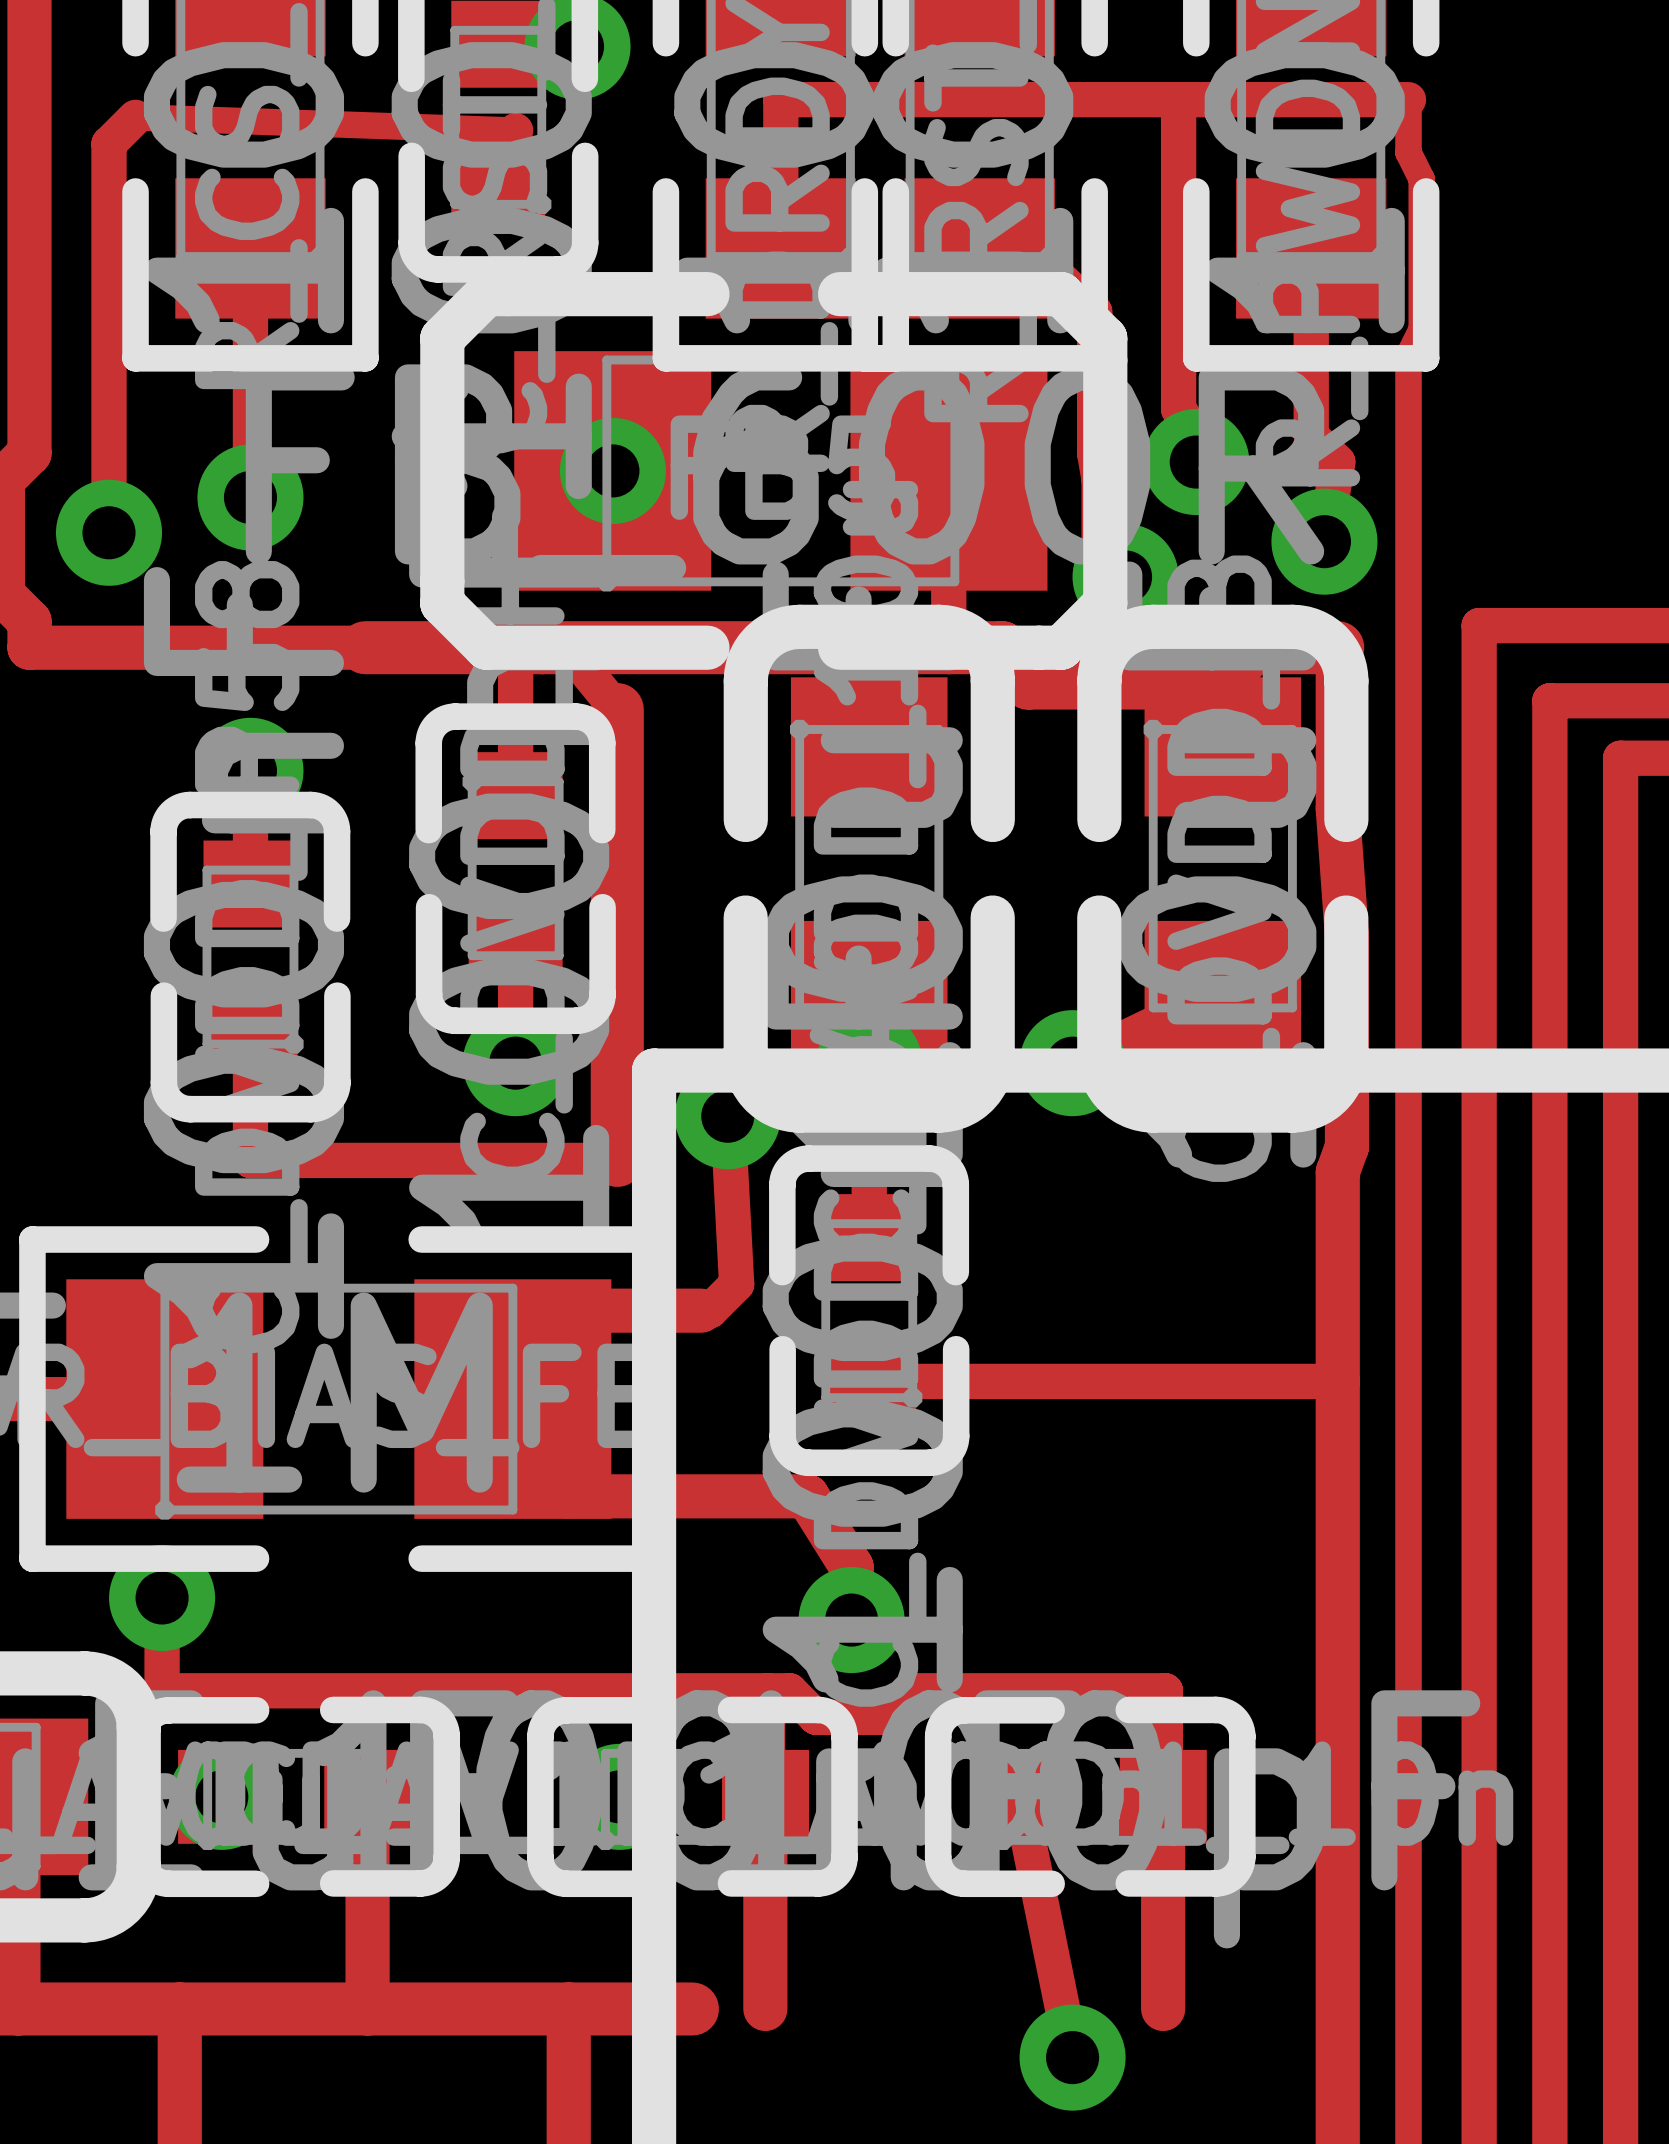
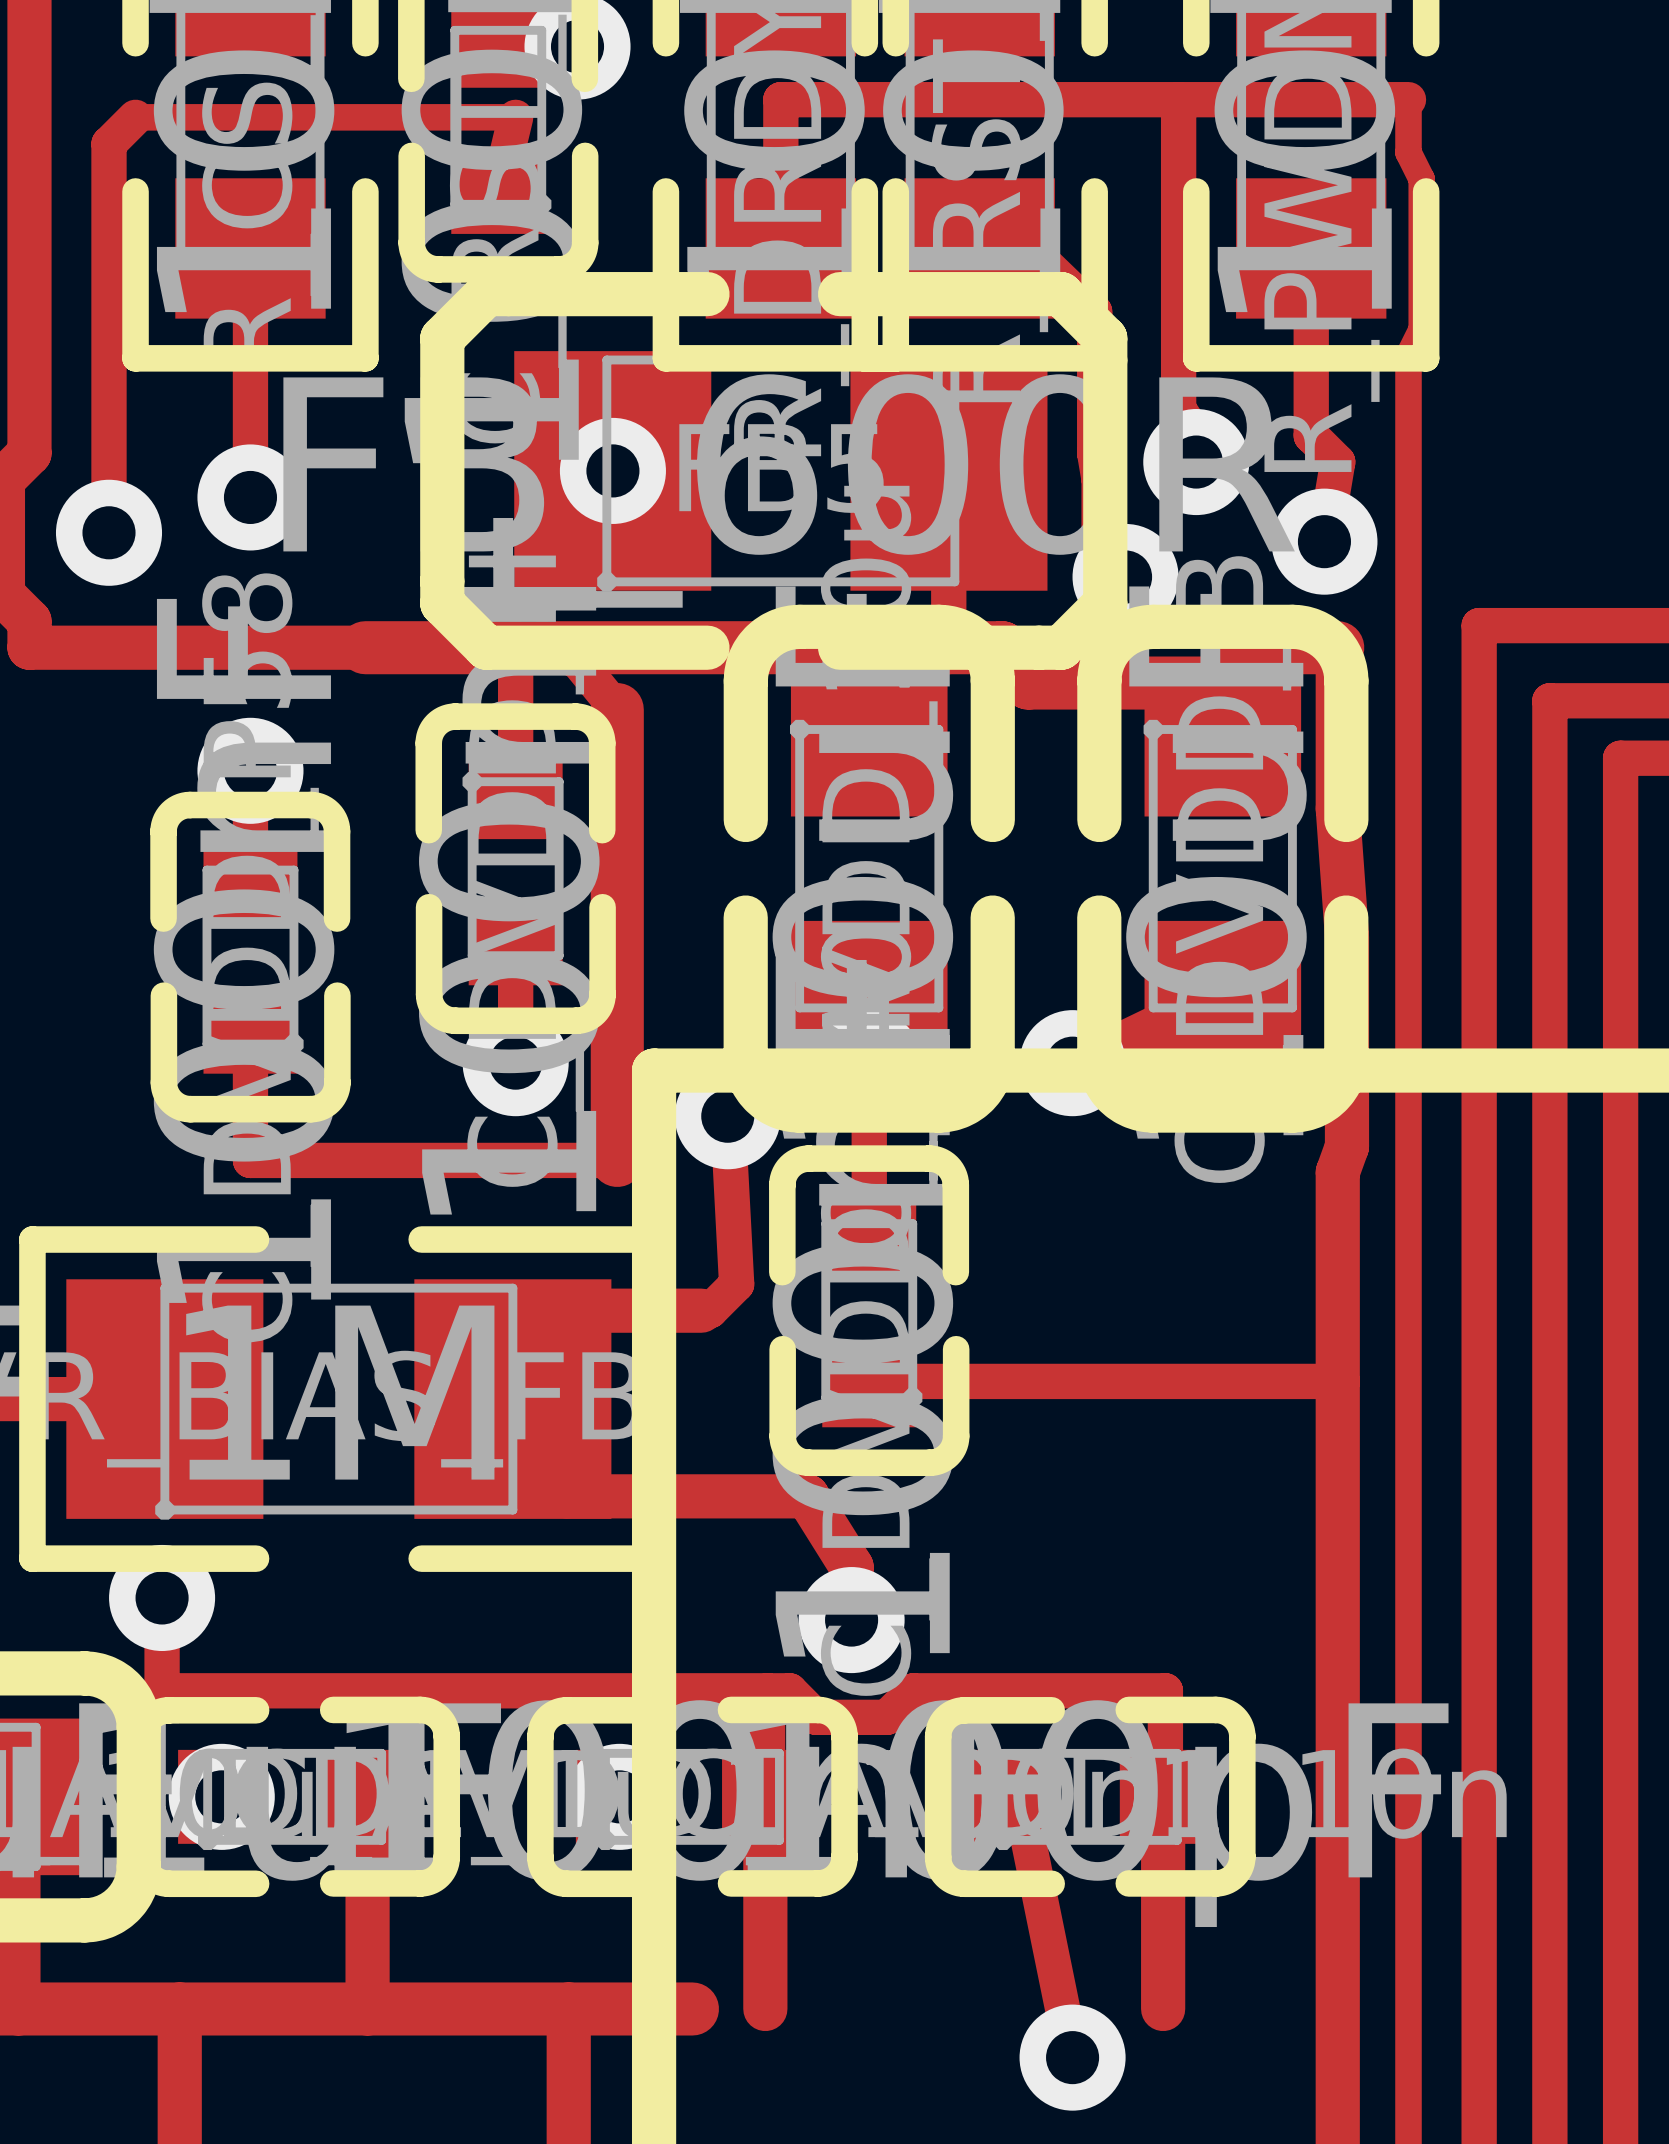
track: (135, 117) (515, 130) (498, 190) -> (135, 117) (515, 117) (498, 190)

